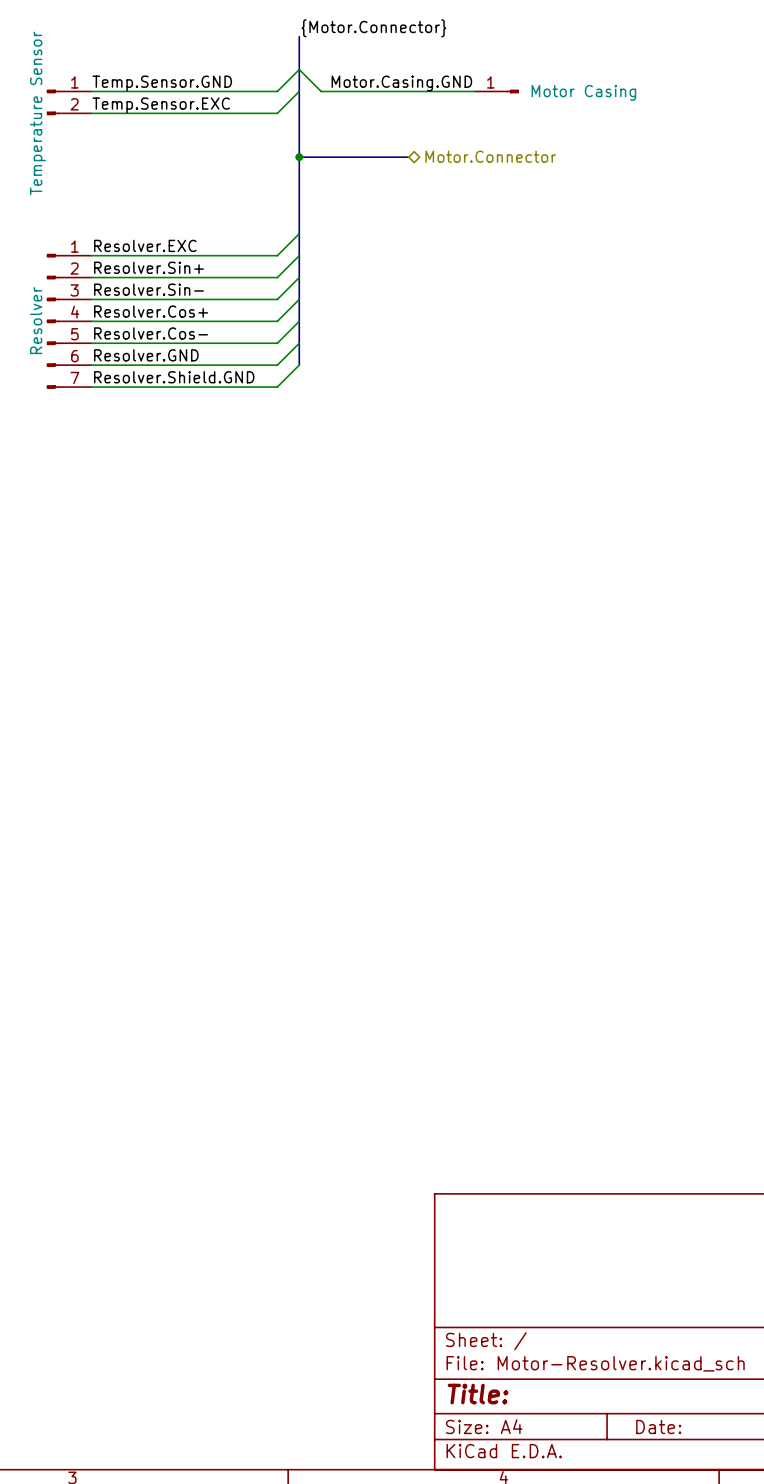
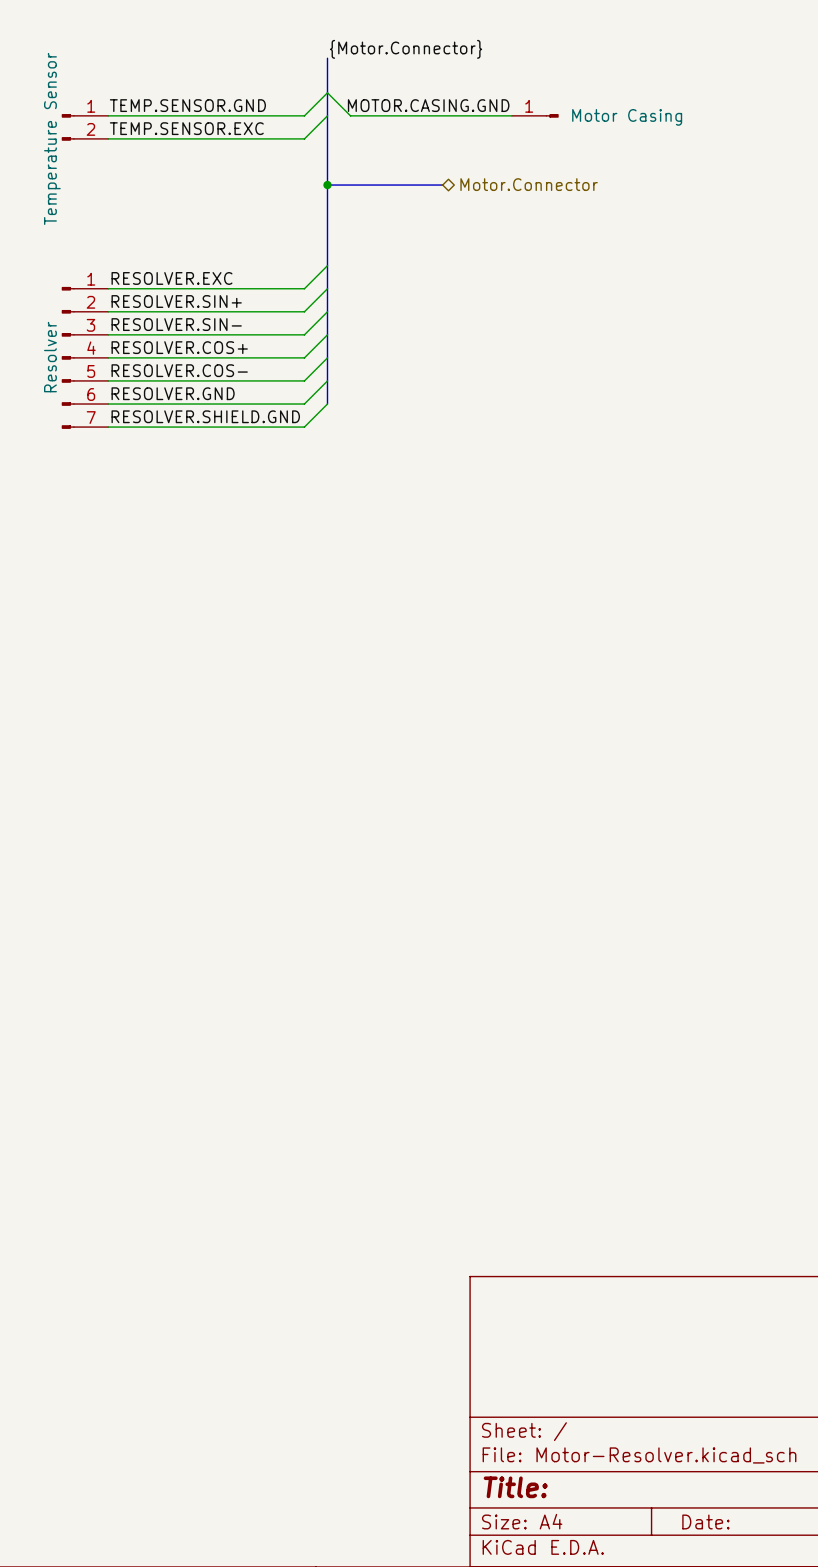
label: Temp.Sensor.GND (162, 83) -> TEMP.SENSOR.GND (187, 105)
label: Motor.Casing.GND (401, 83) -> MOTOR.CASING.GND (428, 105)
label: Temp.Sensor.EXC (161, 105) -> TEMP.SENSOR.EXC (186, 128)
label: Resolver.EXC (145, 245) -> RESOLVER.EXC (171, 278)
label: Resolver.Sin+ (148, 267) -> RESOLVER.SIN+ (176, 301)
label: Resolver.Sin- (148, 289) -> RESOLVER.SIN- (176, 324)
label: Resolver.Cos+ (151, 311) -> RESOLVER.COS+ (179, 347)
label: Resolver.Cos- (151, 333) -> RESOLVER.COS- (179, 370)
label: Resolver.GND (146, 355) -> RESOLVER.GND (173, 393)
label: Resolver.Shield.GND (174, 377) -> RESOLVER.SHIELD.GND (205, 416)

